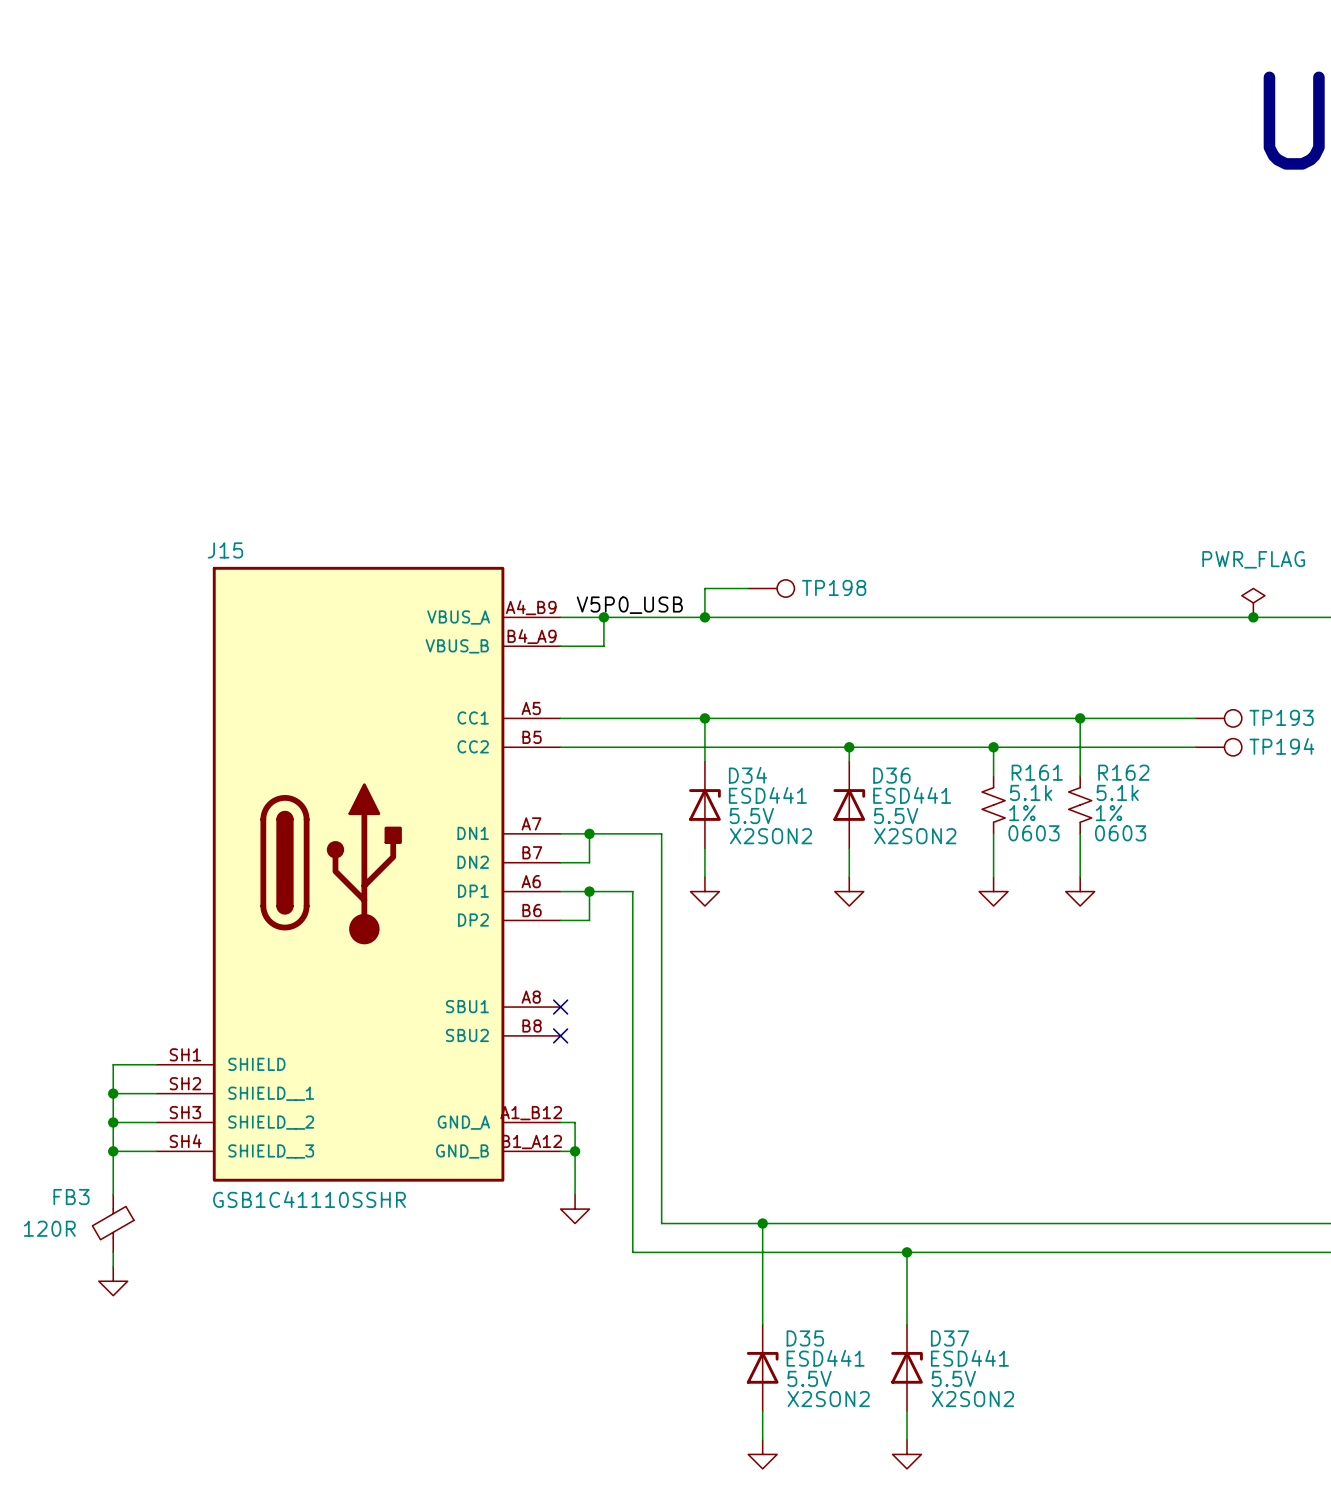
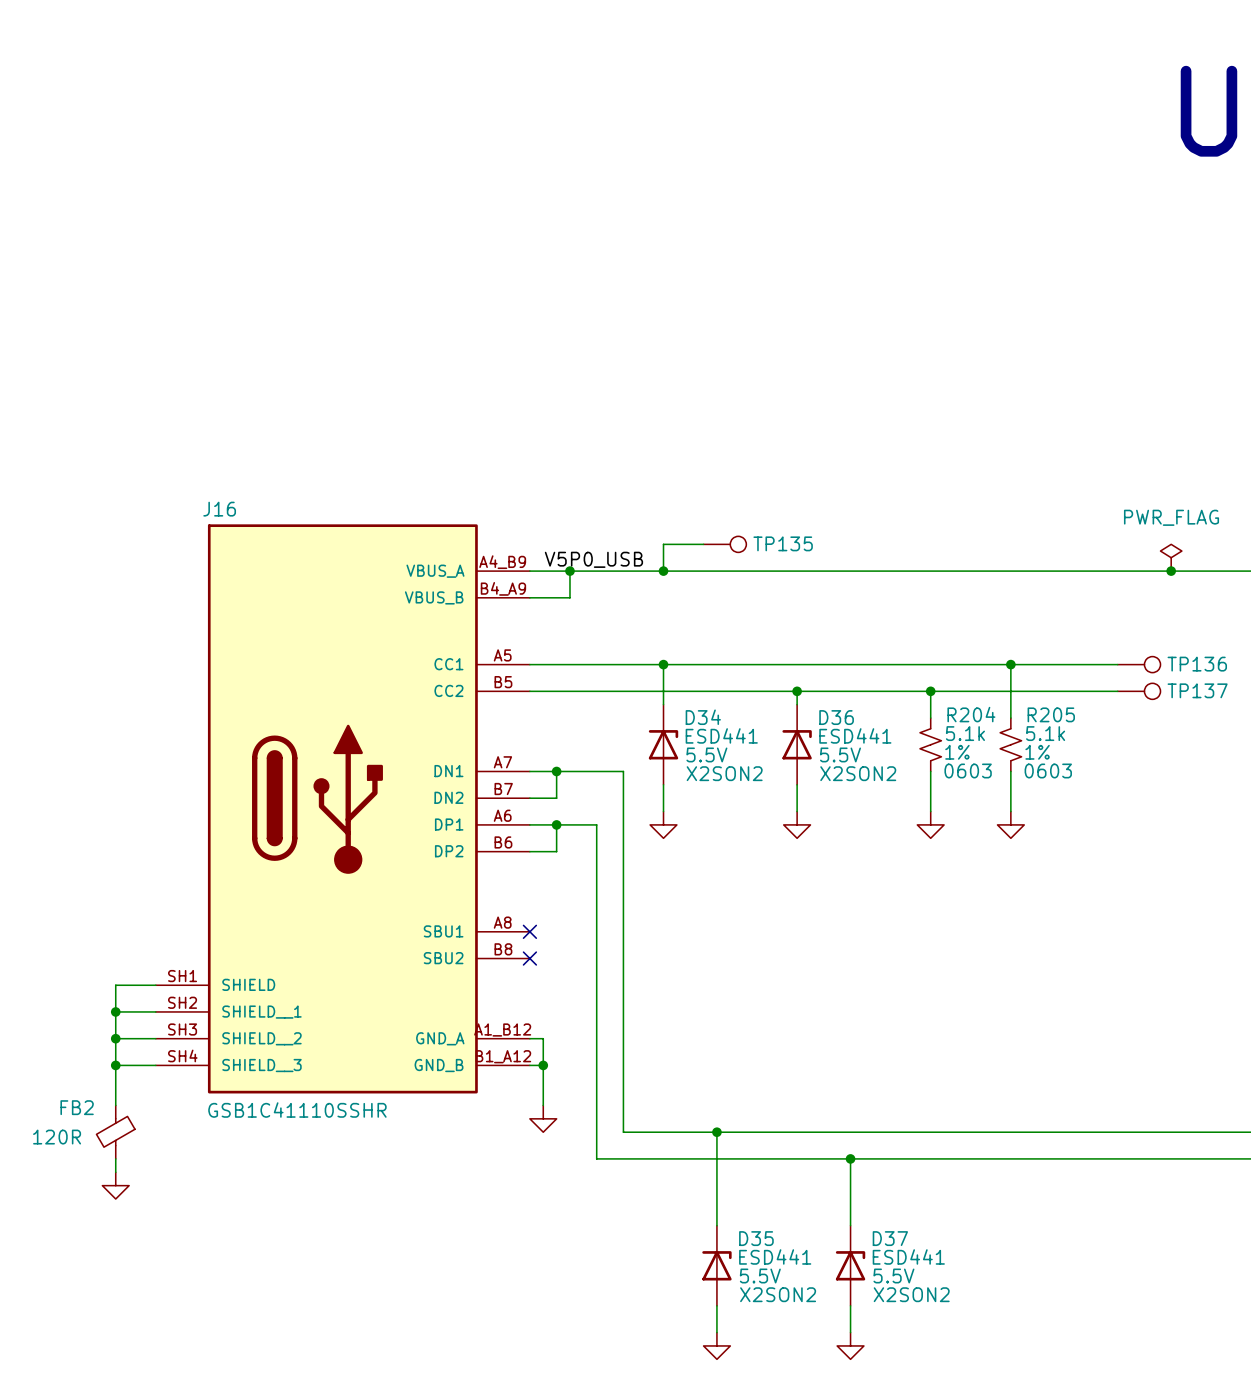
J15 name: J15 (225, 550) -> J16 (219, 509)
TP198 name: TP198 (834, 587) -> TP135 (783, 543)
TP193 name: TP193 (1281, 717) -> TP136 (1197, 664)
TP194 name: TP194 (1281, 746) -> TP137 (1197, 690)
R161 name: R161 (1037, 772) -> R204 (971, 714)
R162 name: R162 (1123, 772) -> R205 (1051, 714)
FB3 name: FB3 (71, 1197) -> FB2 (77, 1107)

